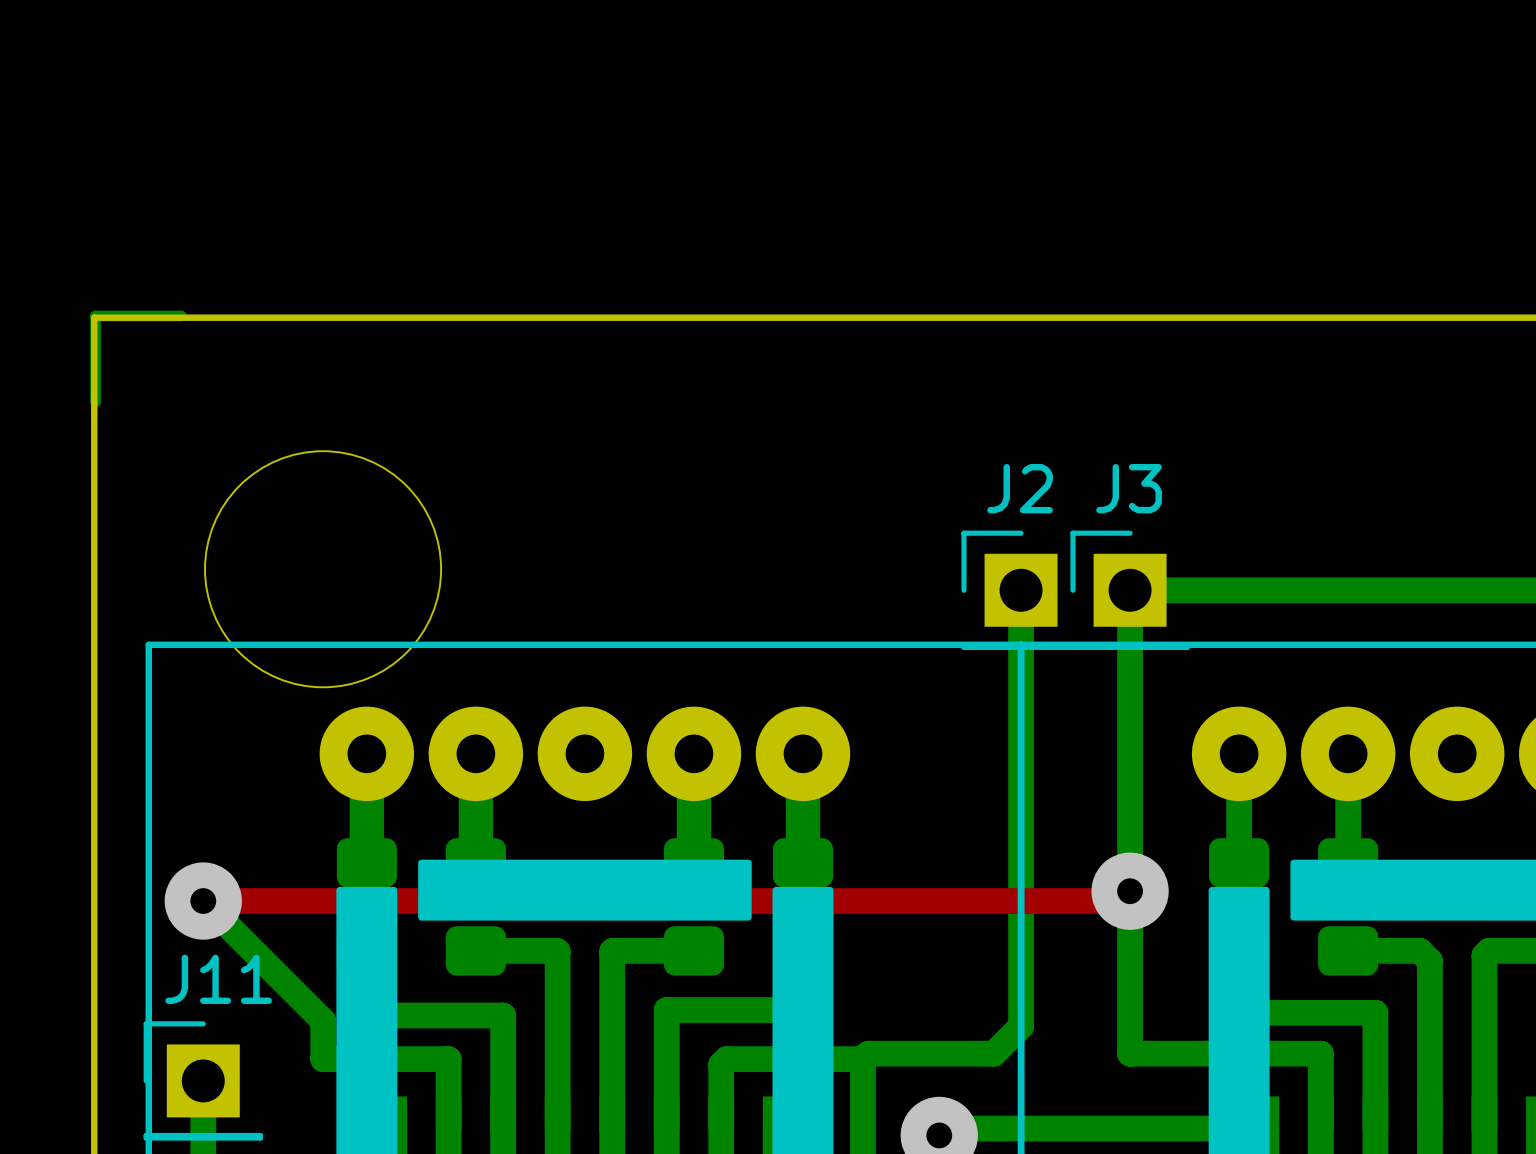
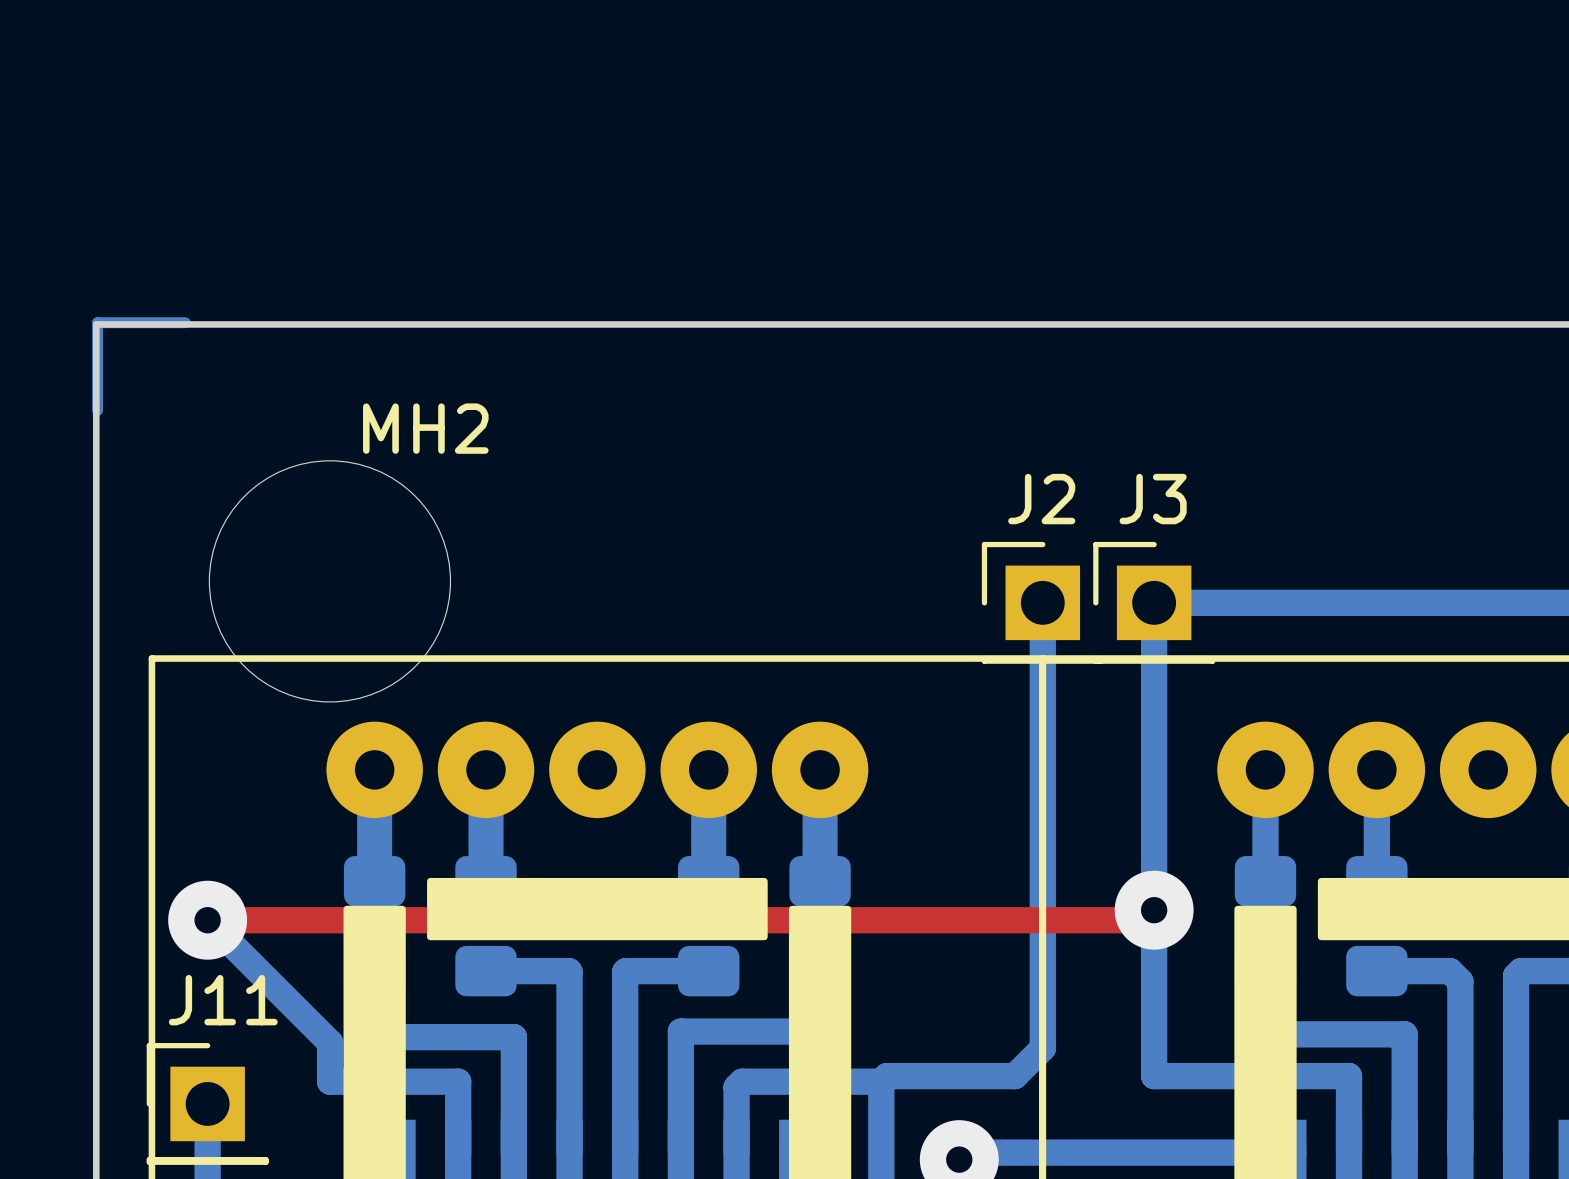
MH2 name: none -> MH2 (425, 428)

